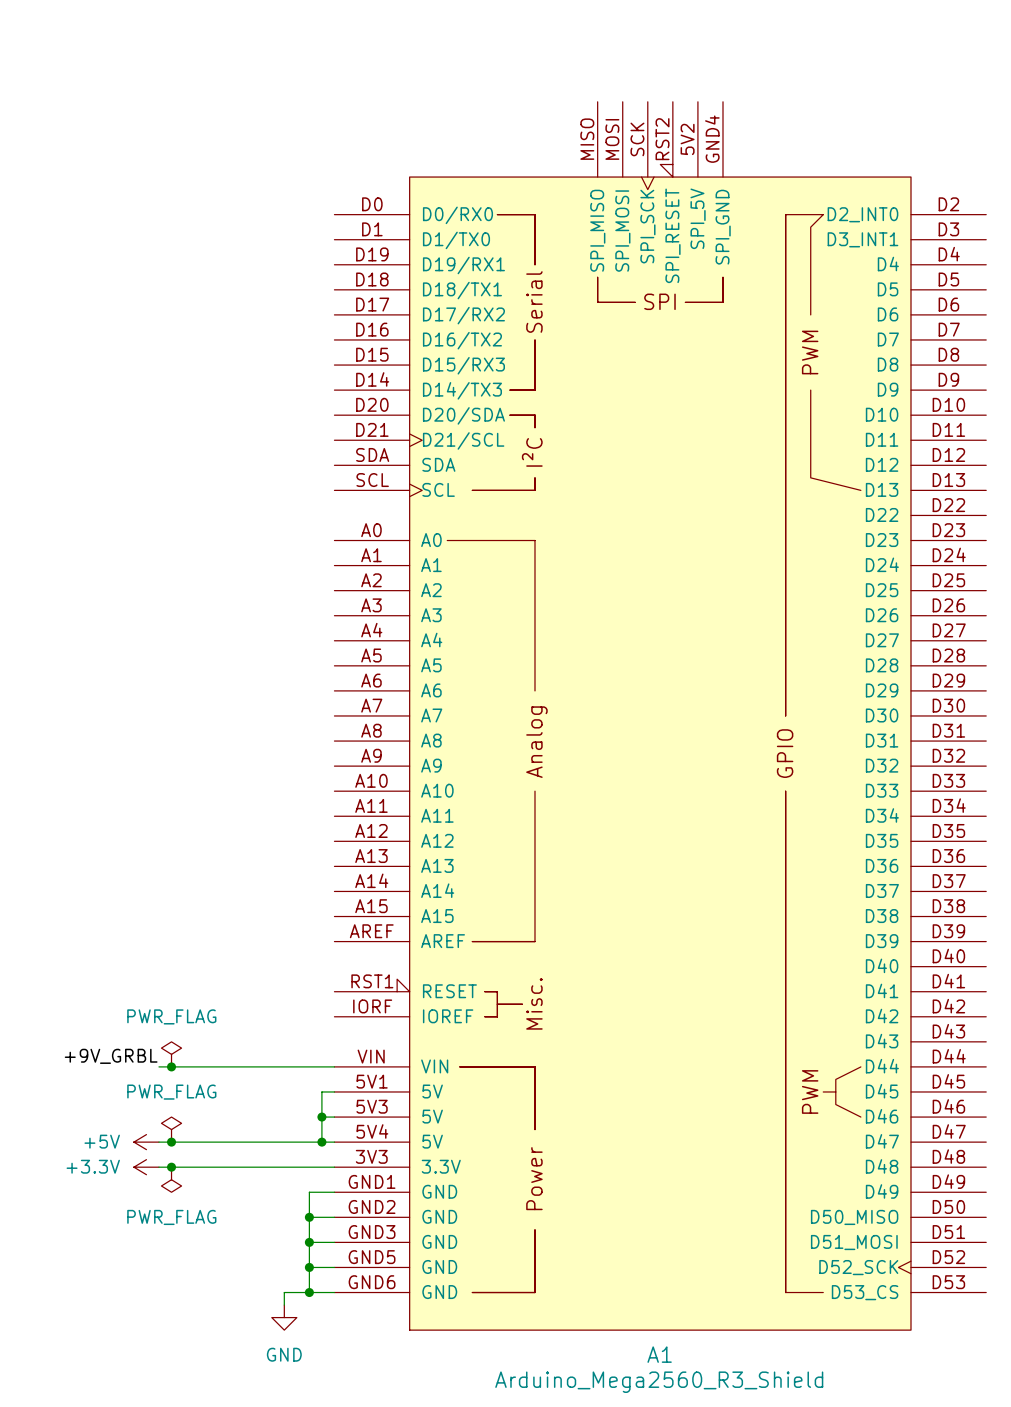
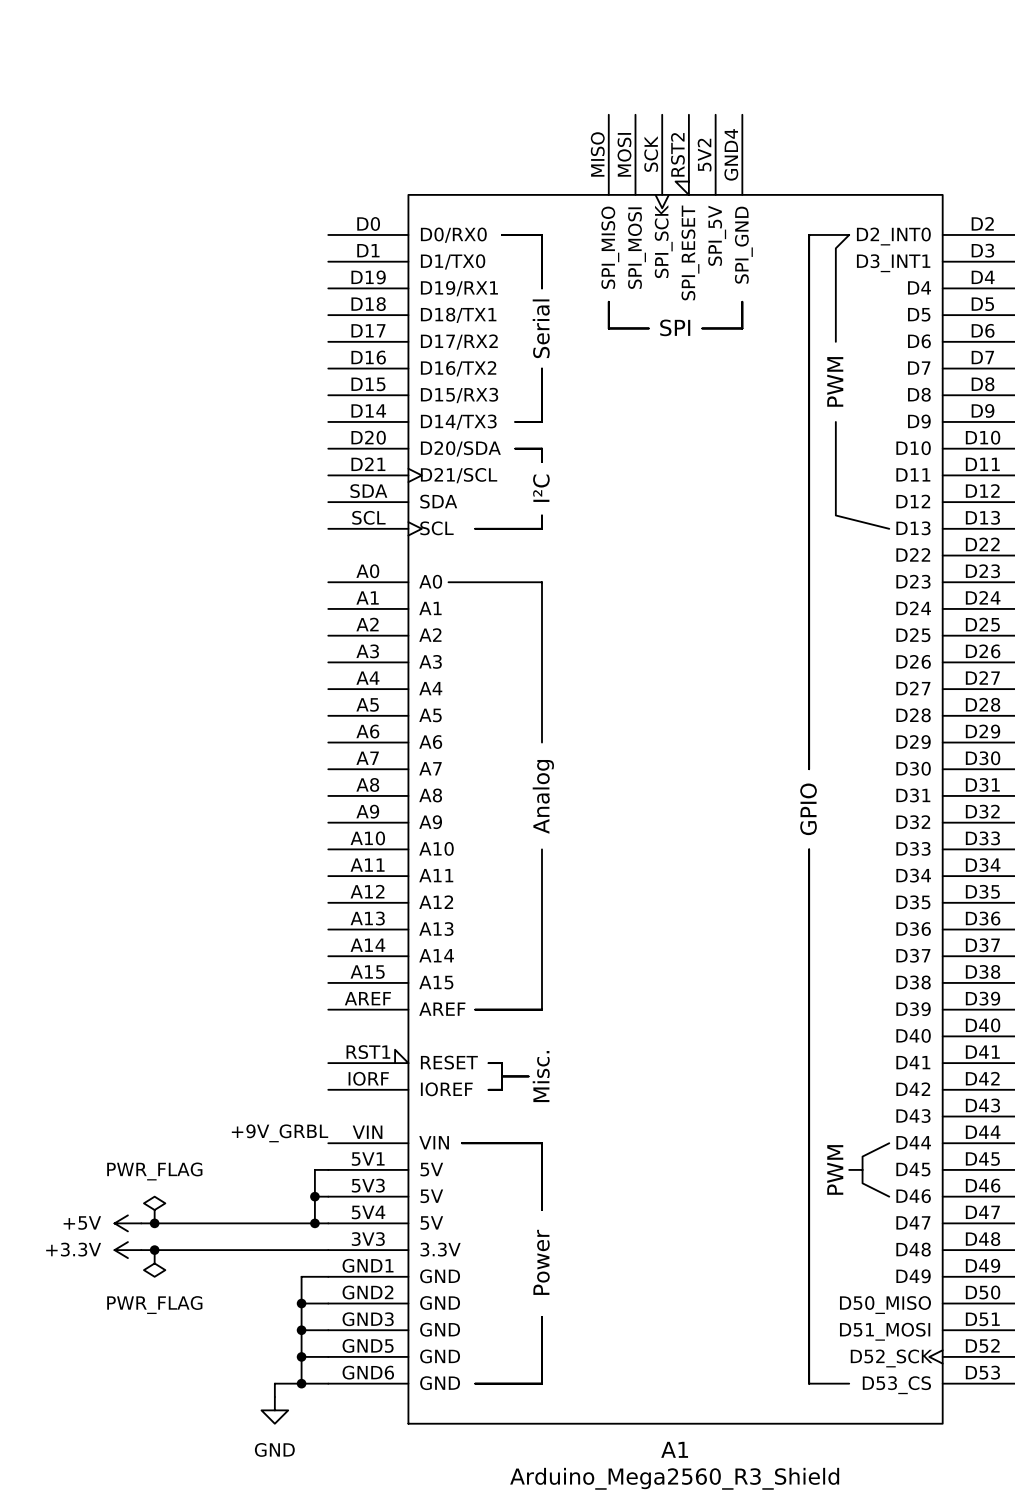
power symbol: PWR_FLAG (171, 1054) -> none
label position: +9V_GRBL (111, 1056) -> +9V_GRBL (280, 1133)
wire: (158, 1066) (334, 1066) -> none
junction: (171, 1066) -> none

